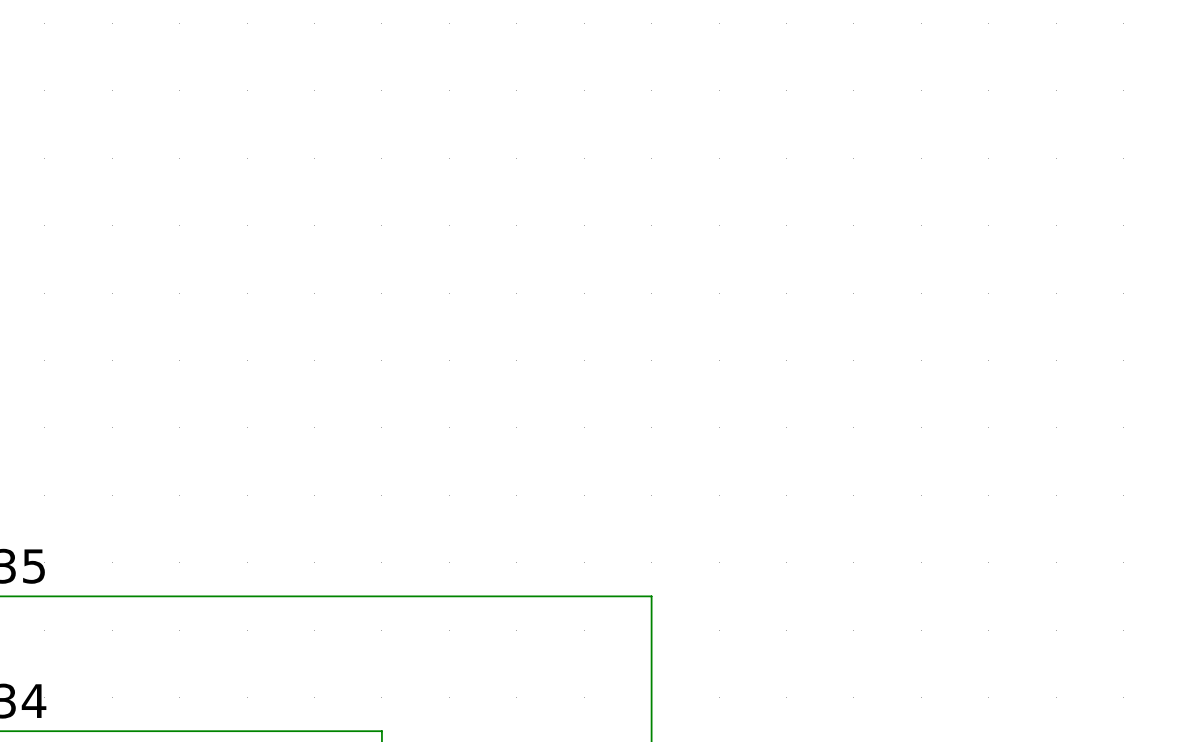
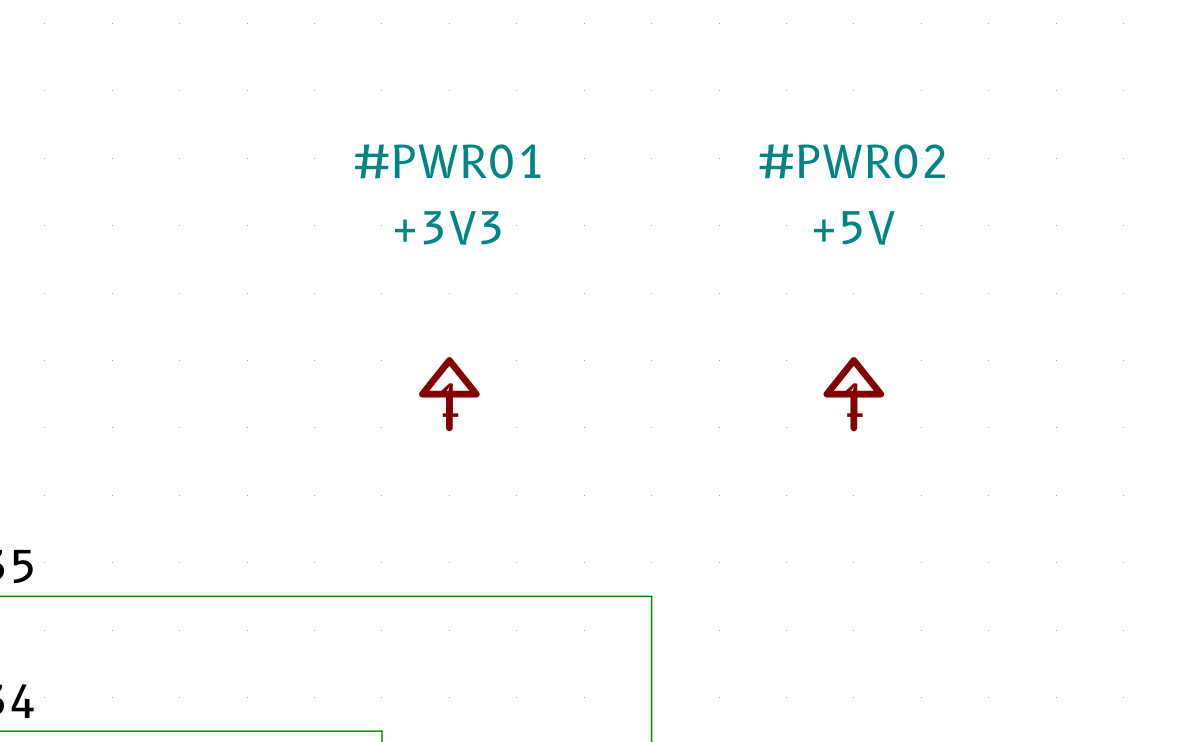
#PWR01: none -> +3V3 (449, 394)
#PWR02: none -> +5V (853, 394)

